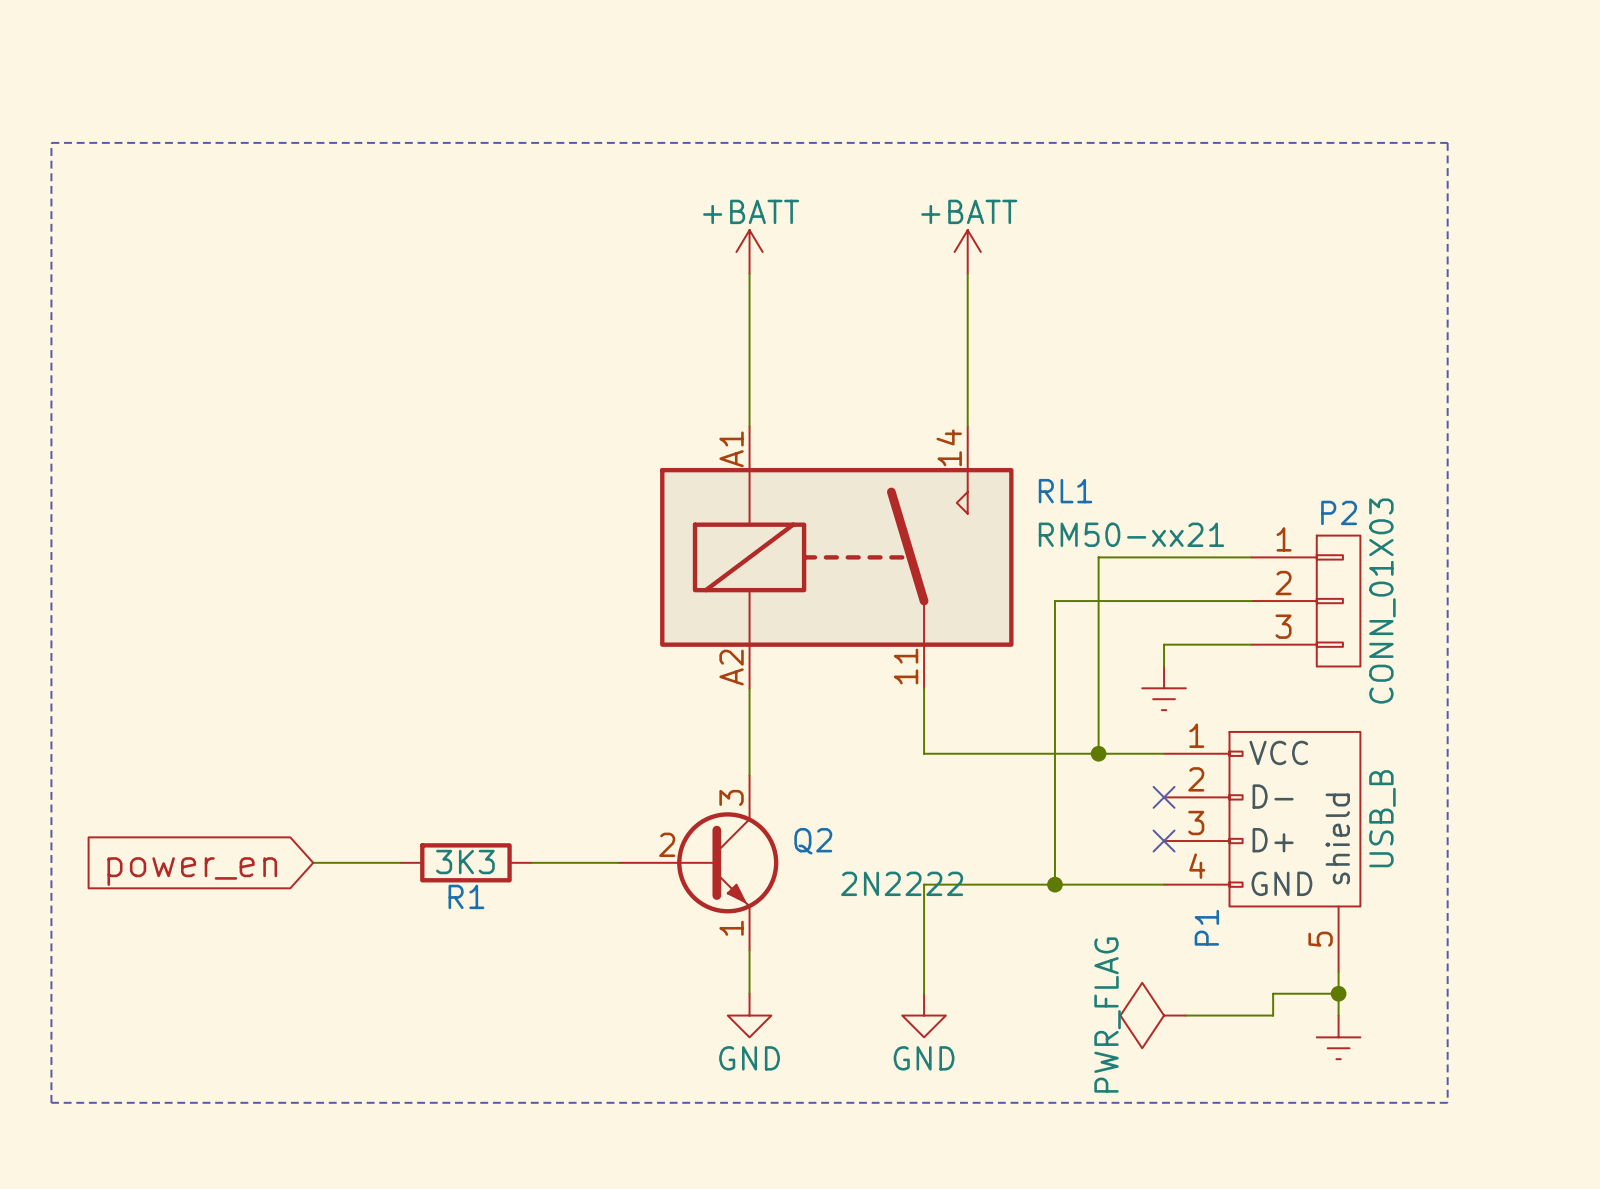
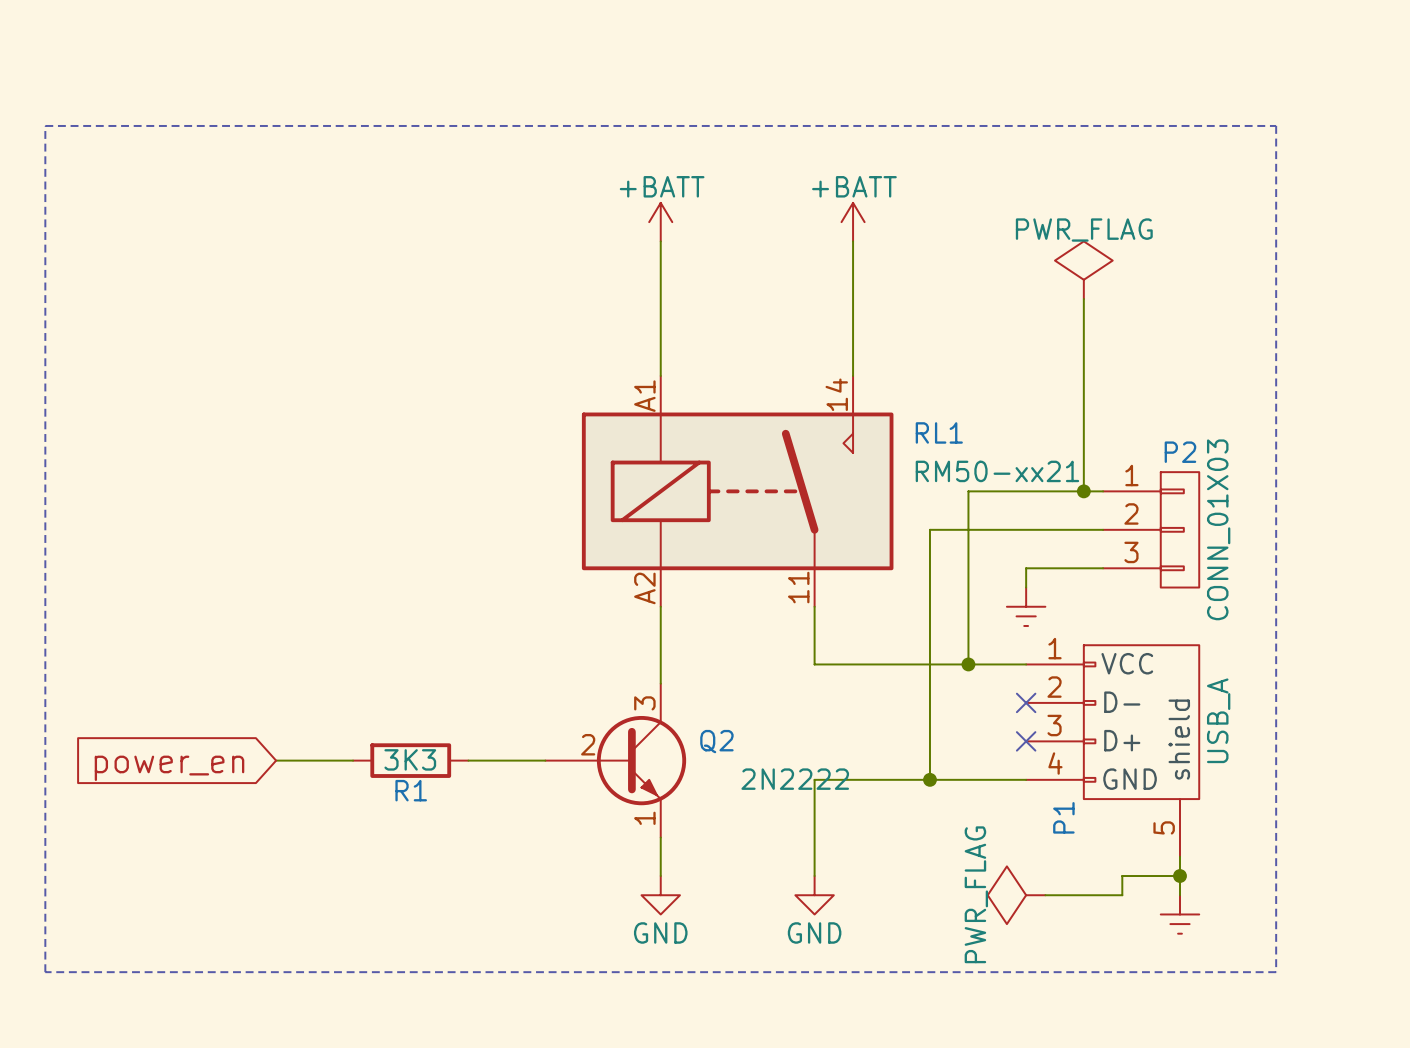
power symbol: none -> PWR_FLAG (1083, 270)
wire: none -> (1083, 299) (1083, 491)
junction: none -> (1083, 491)
P1 value: USB_B (1382, 818) -> USB_A (1218, 720)

